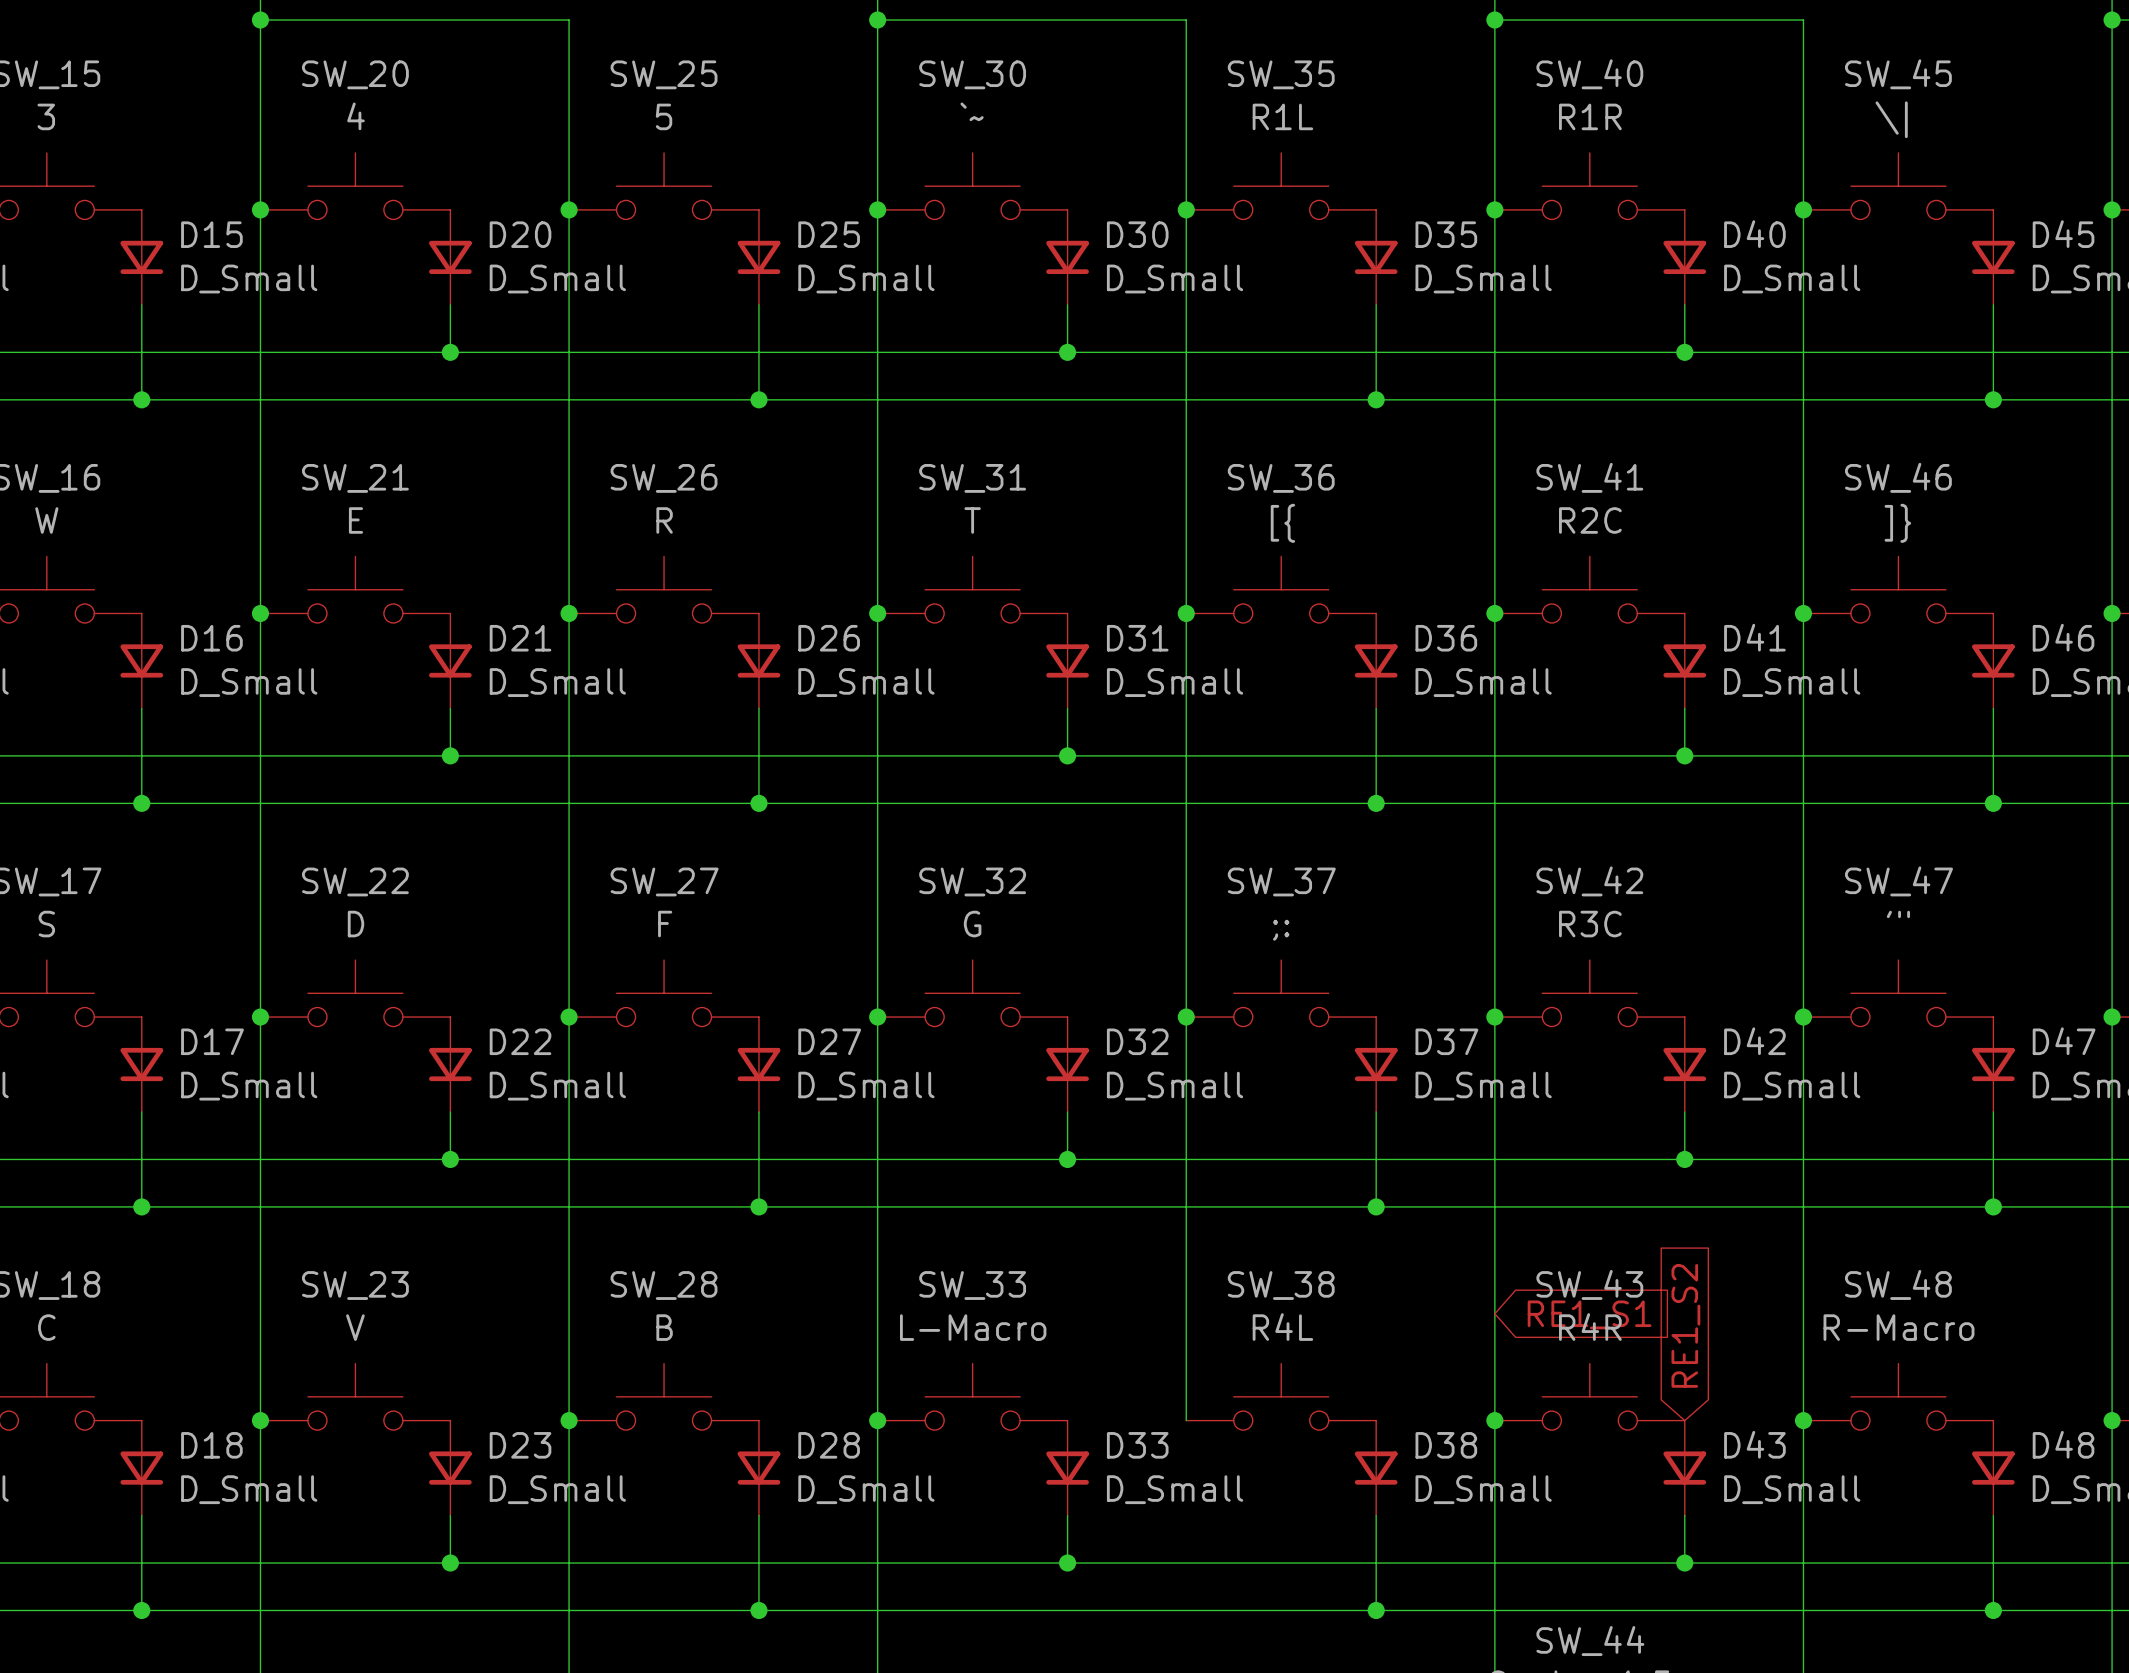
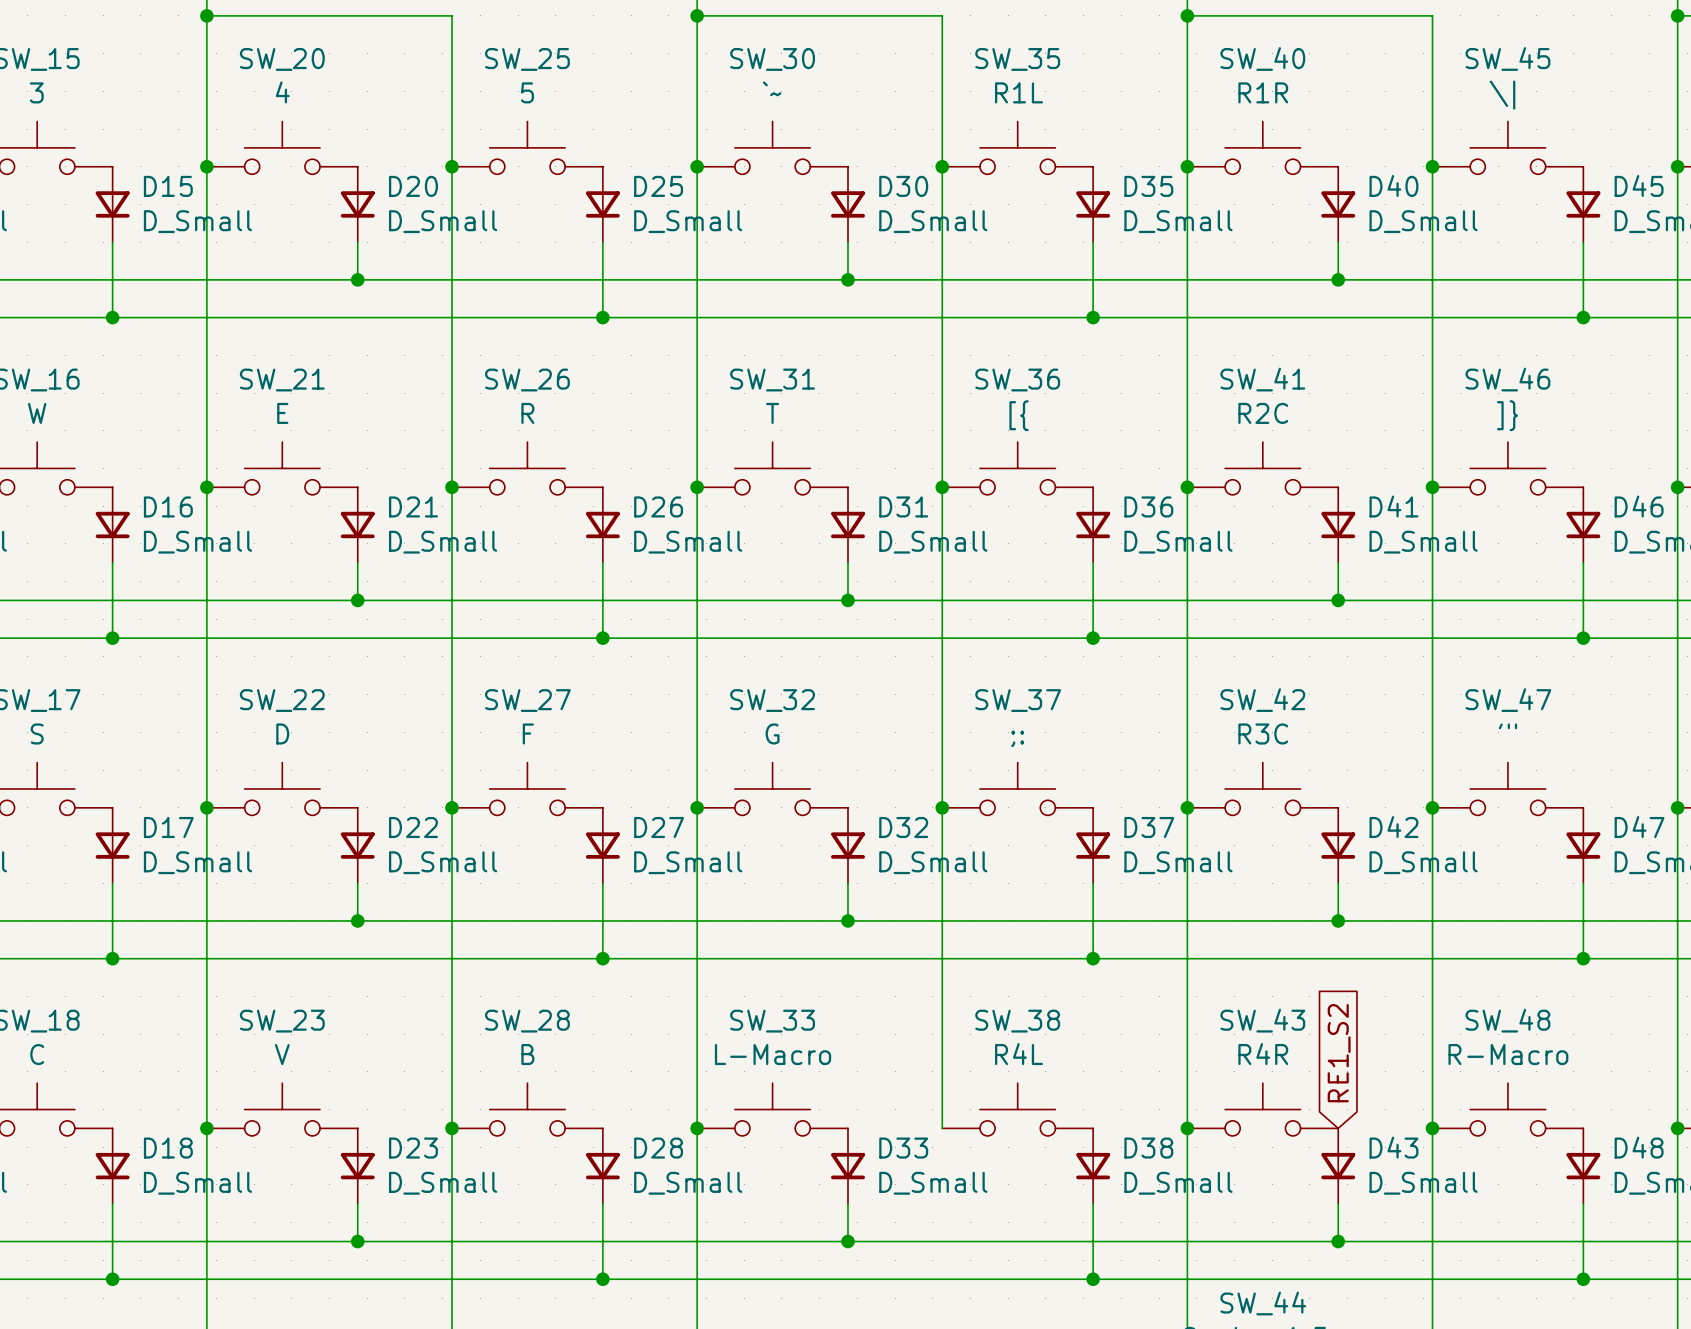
global label: RE1_S1 (1589, 1314) -> none

